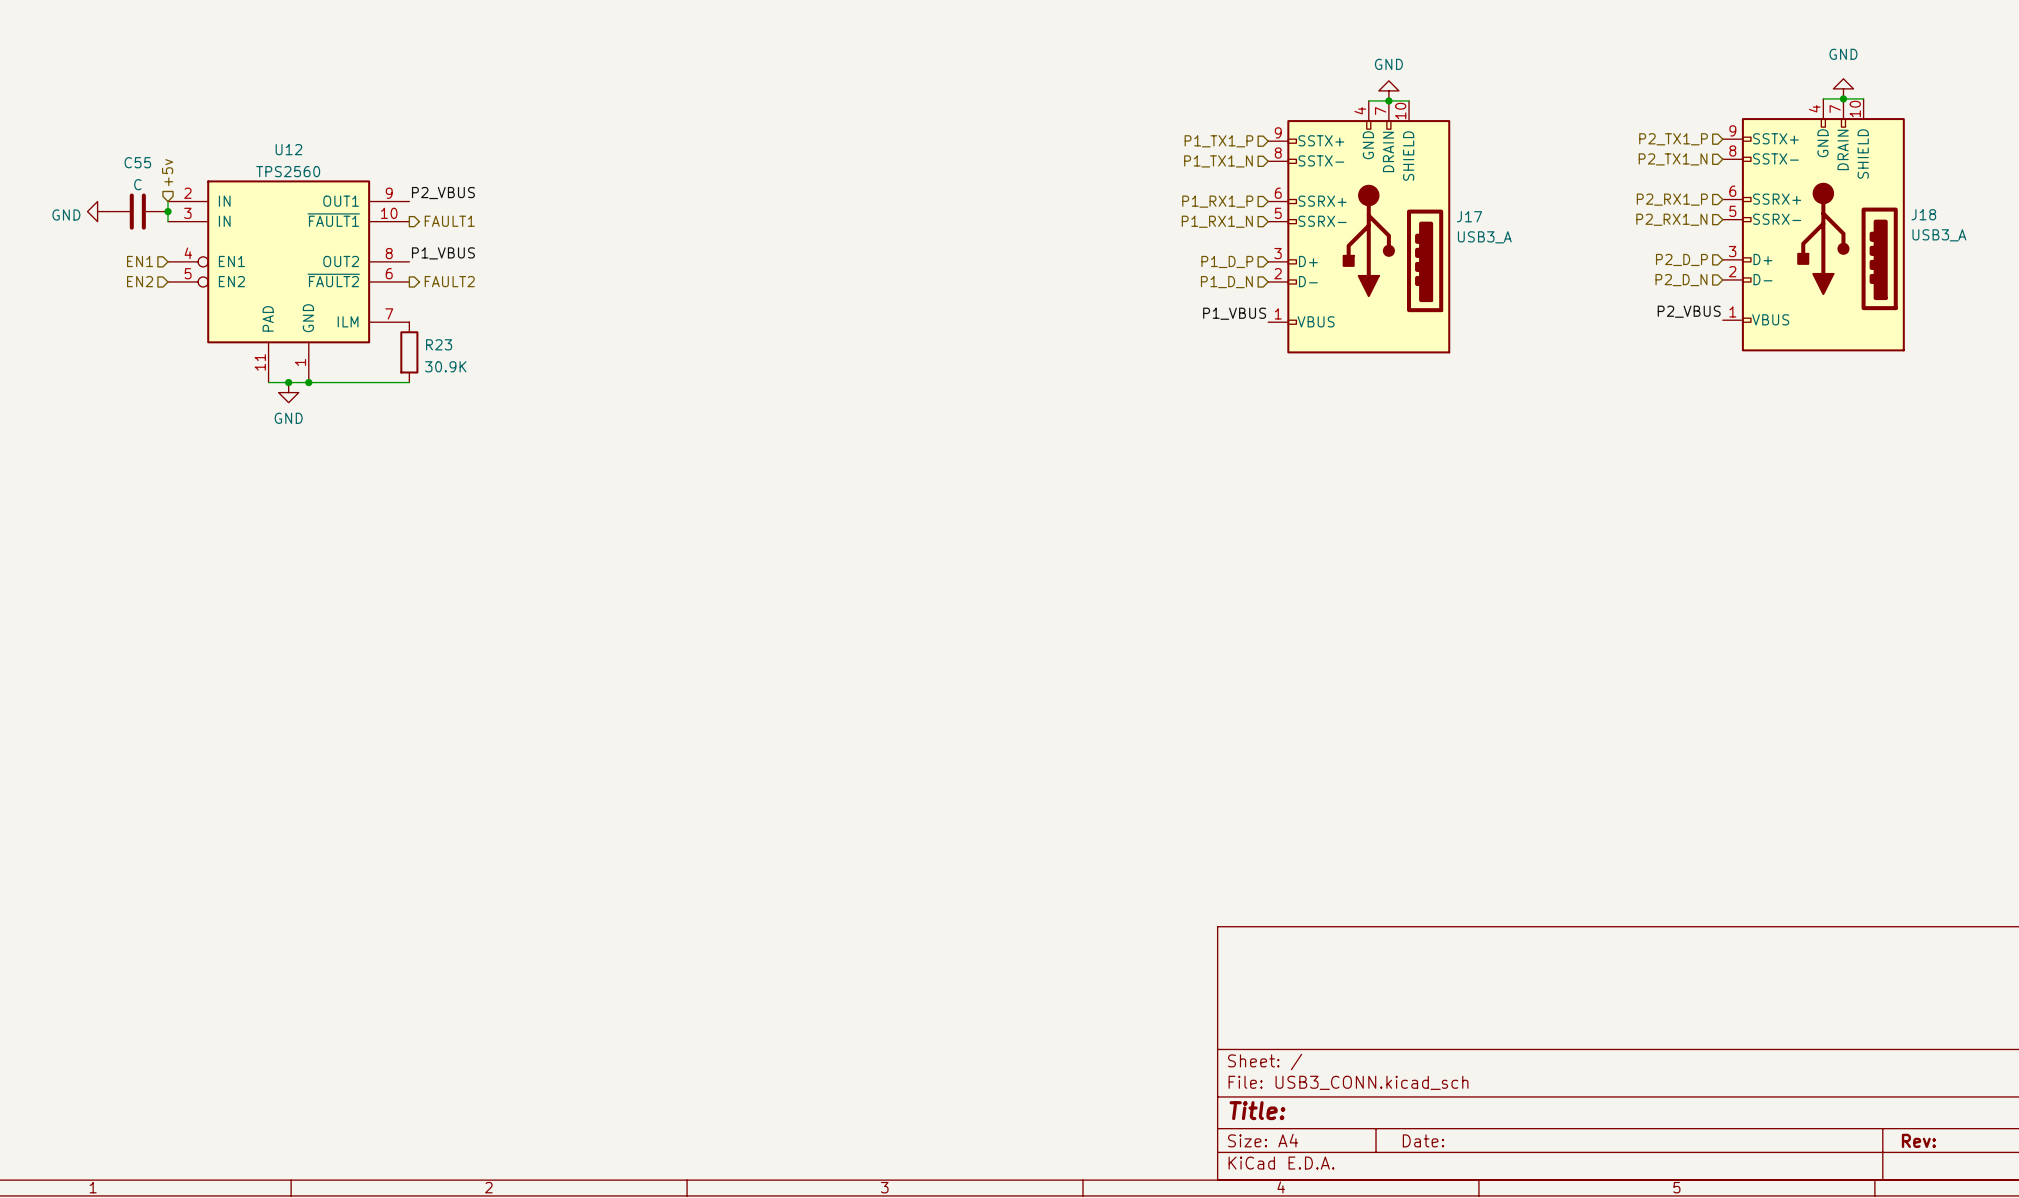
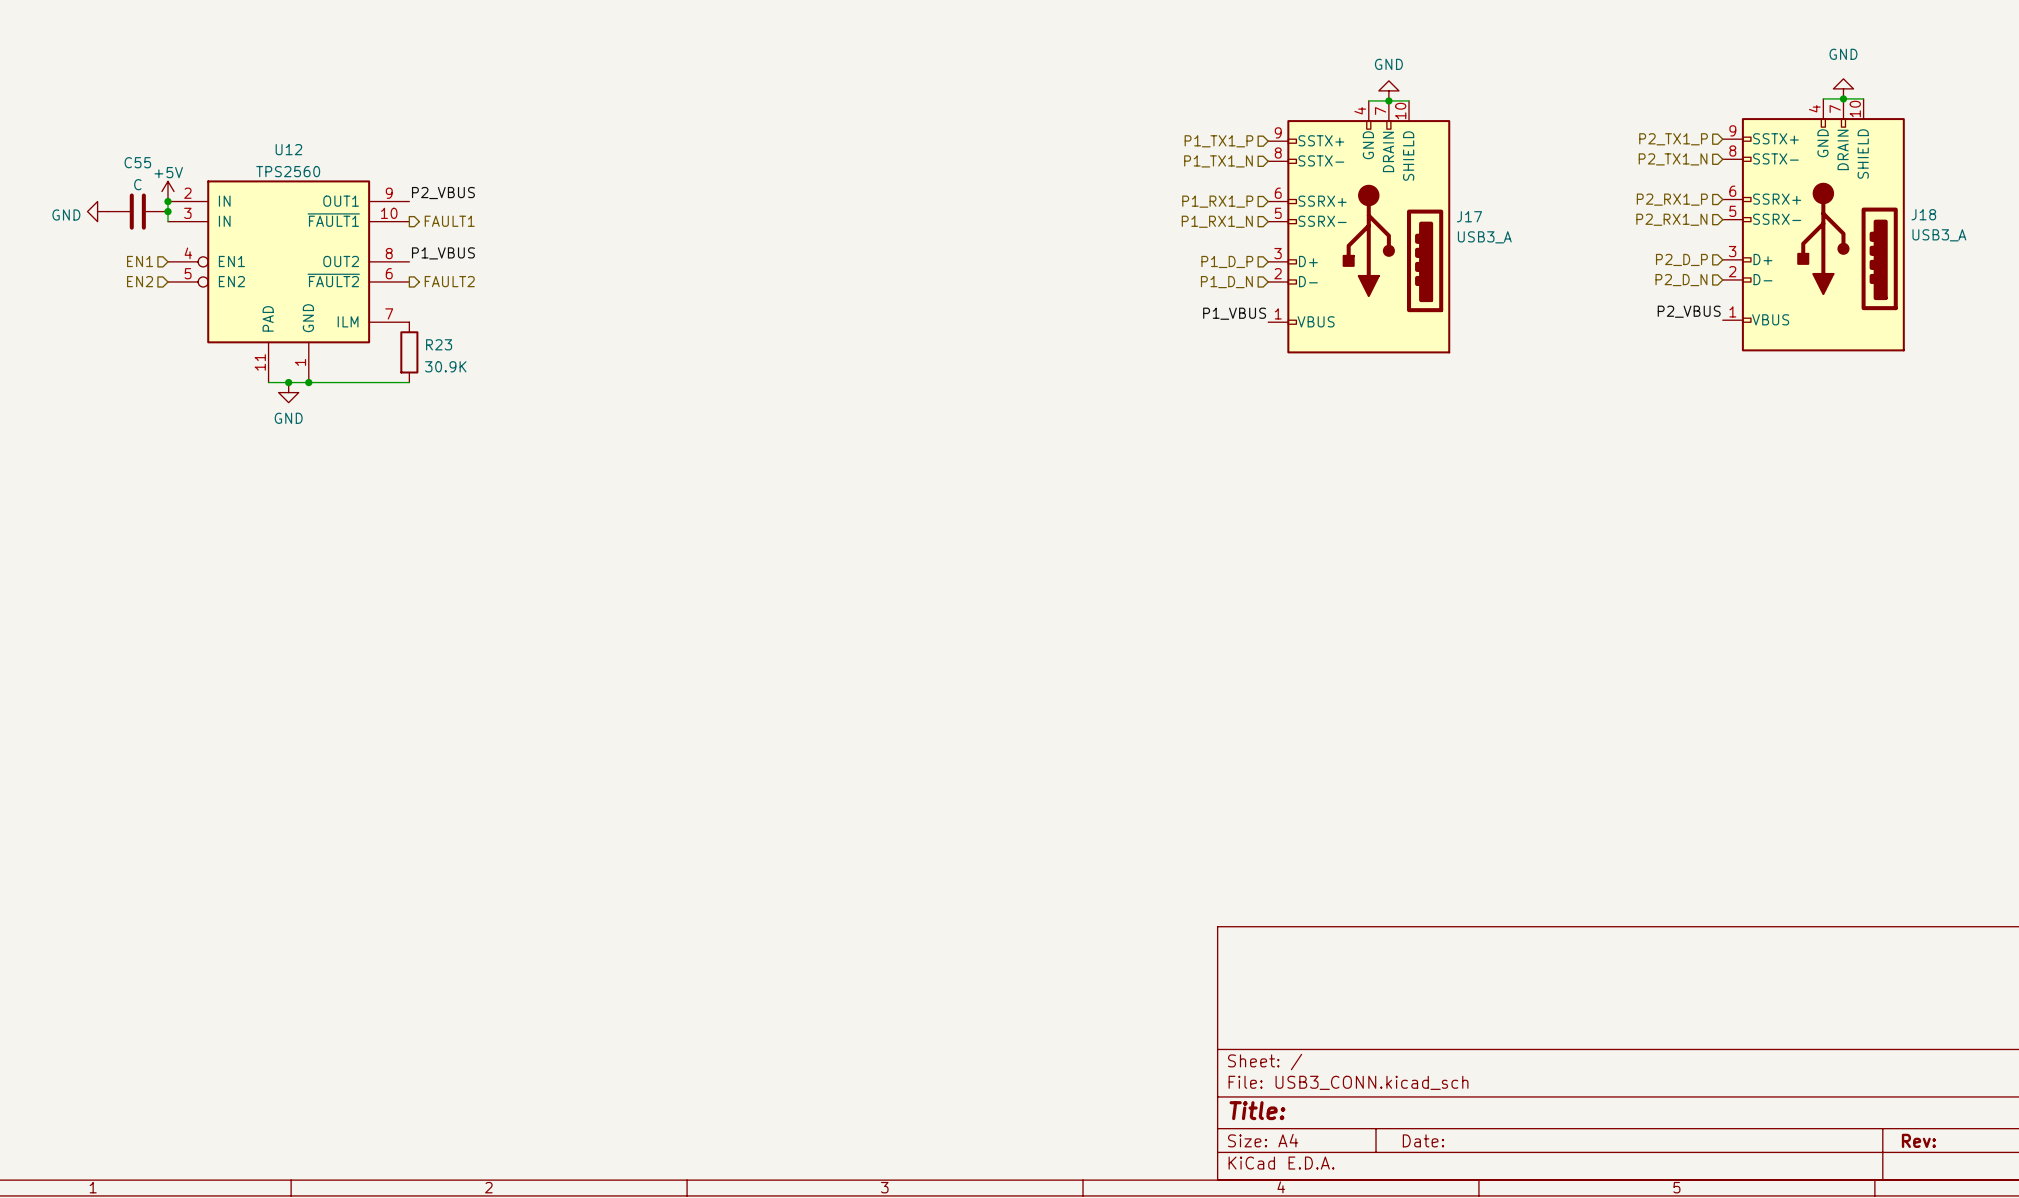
hierarchical label: +5v (167, 172) -> none
power symbol: none -> +5V (167, 191)
junction: none -> (167, 201)

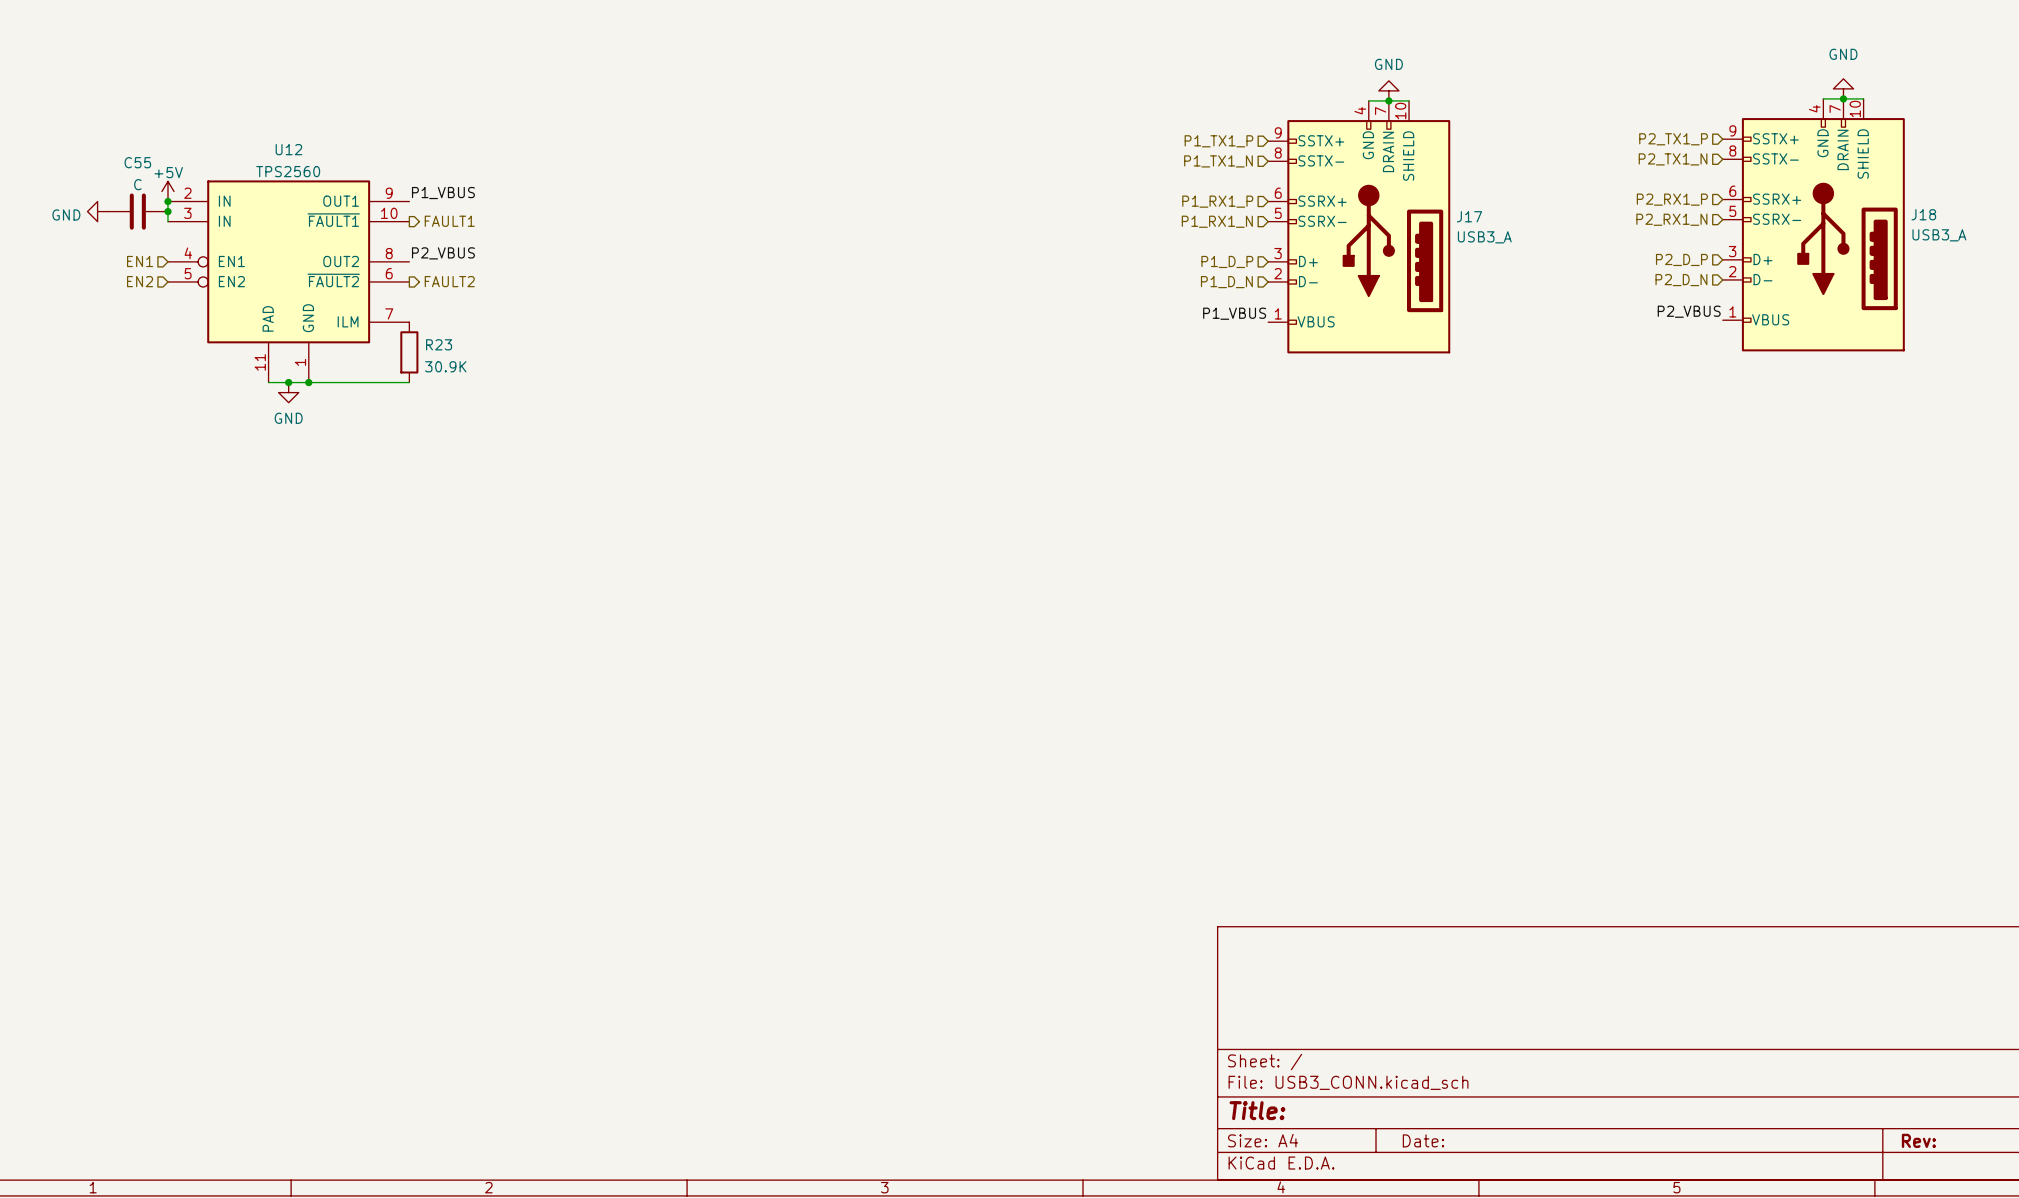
label: P2_VBUS (443, 193) -> P1_VBUS (443, 193)
label: P1_VBUS (443, 253) -> P2_VBUS (443, 253)

